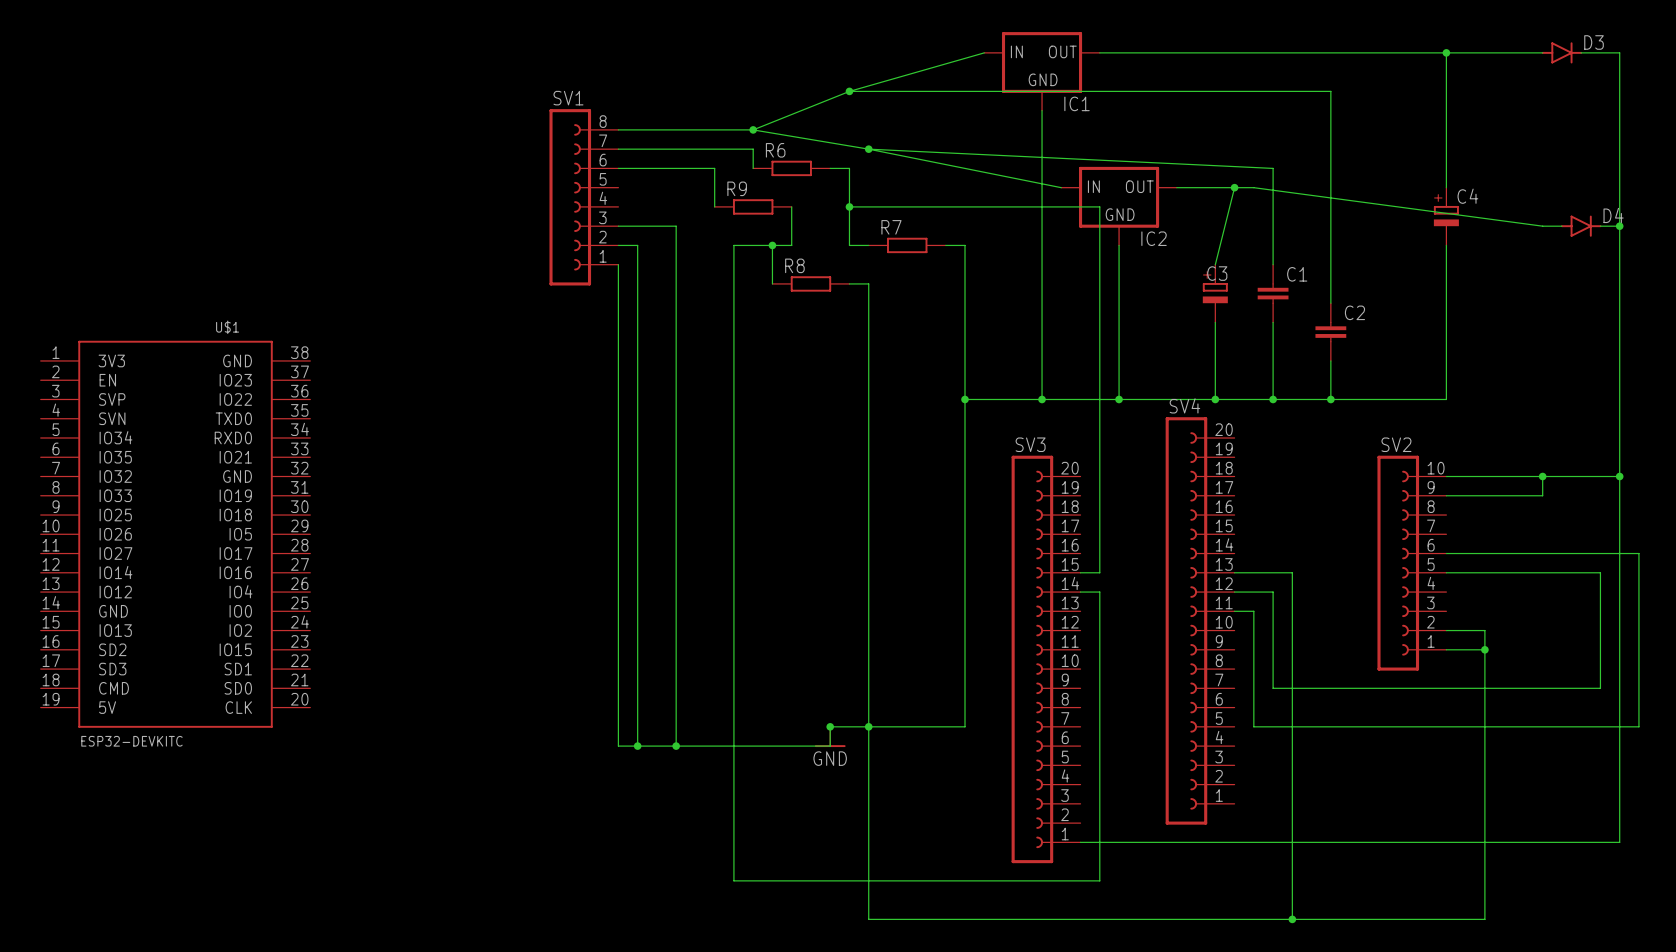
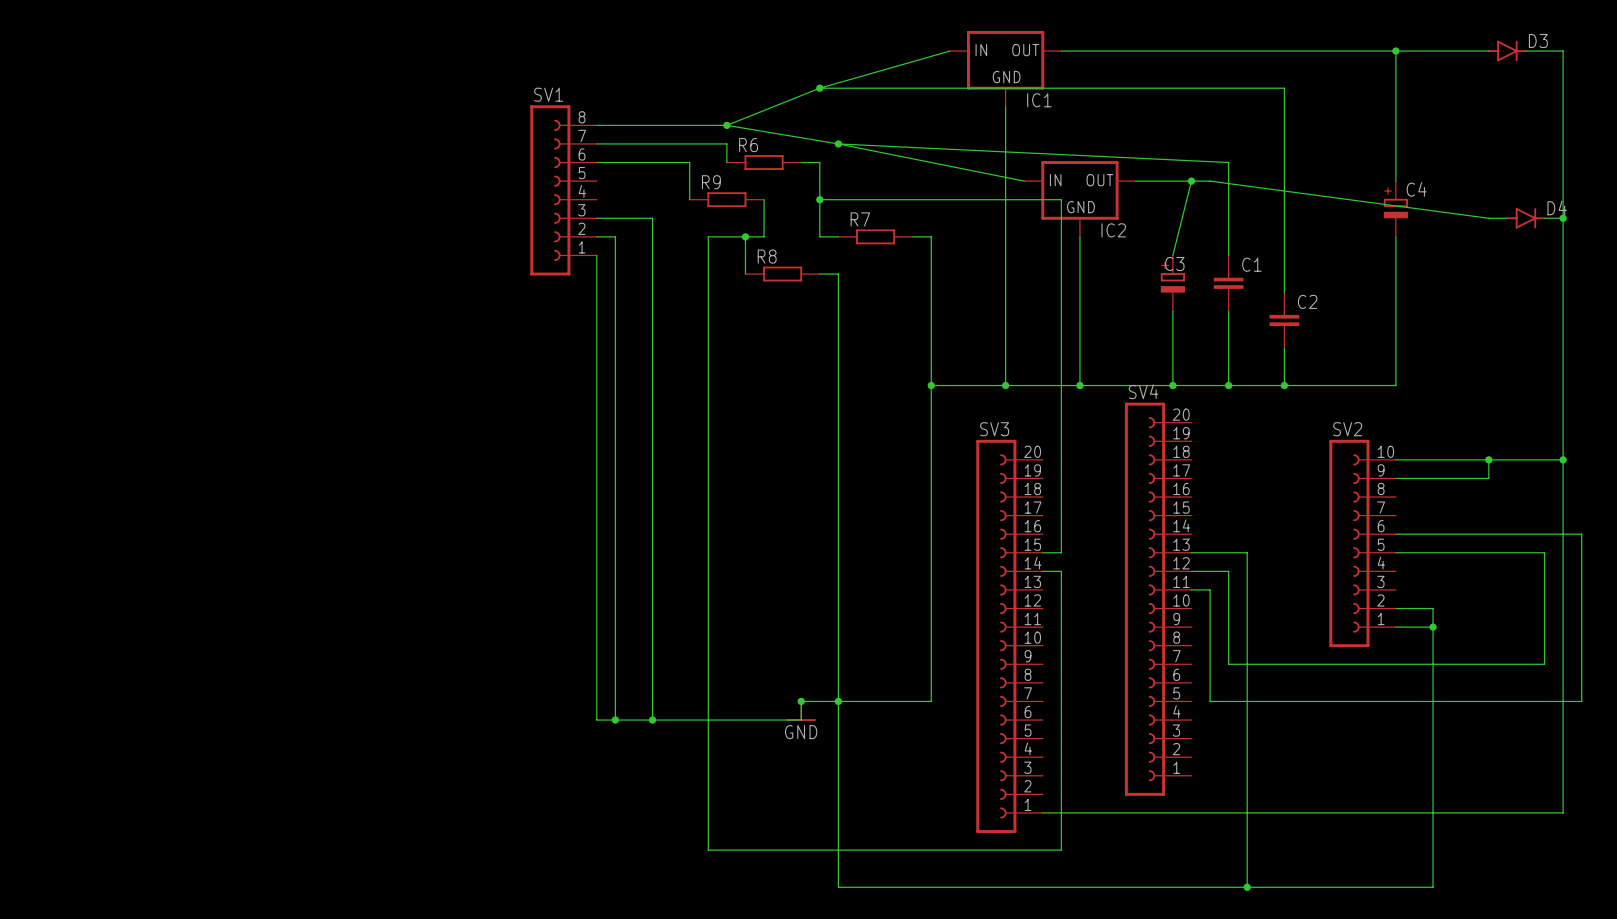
U$1: (175, 534) -> none

